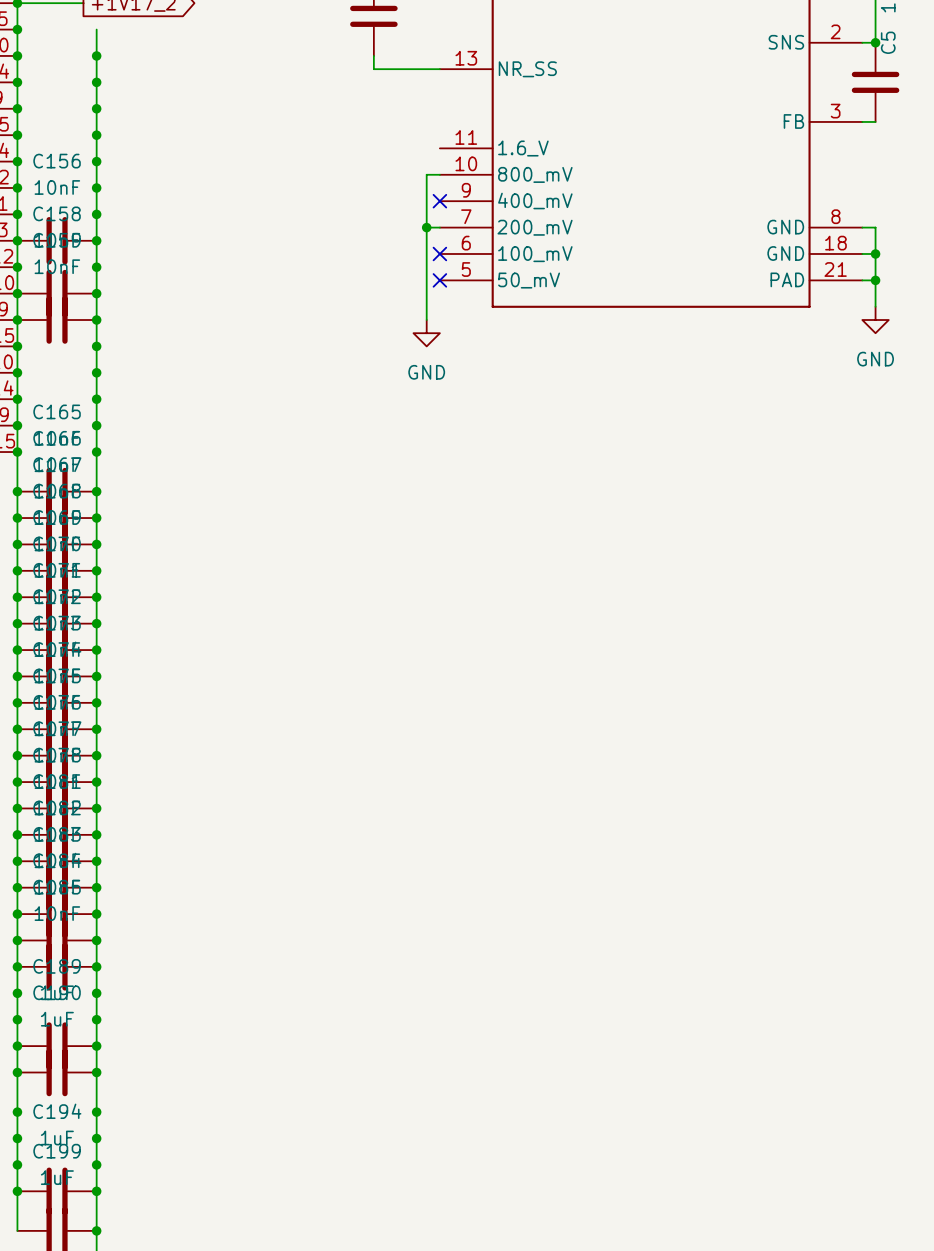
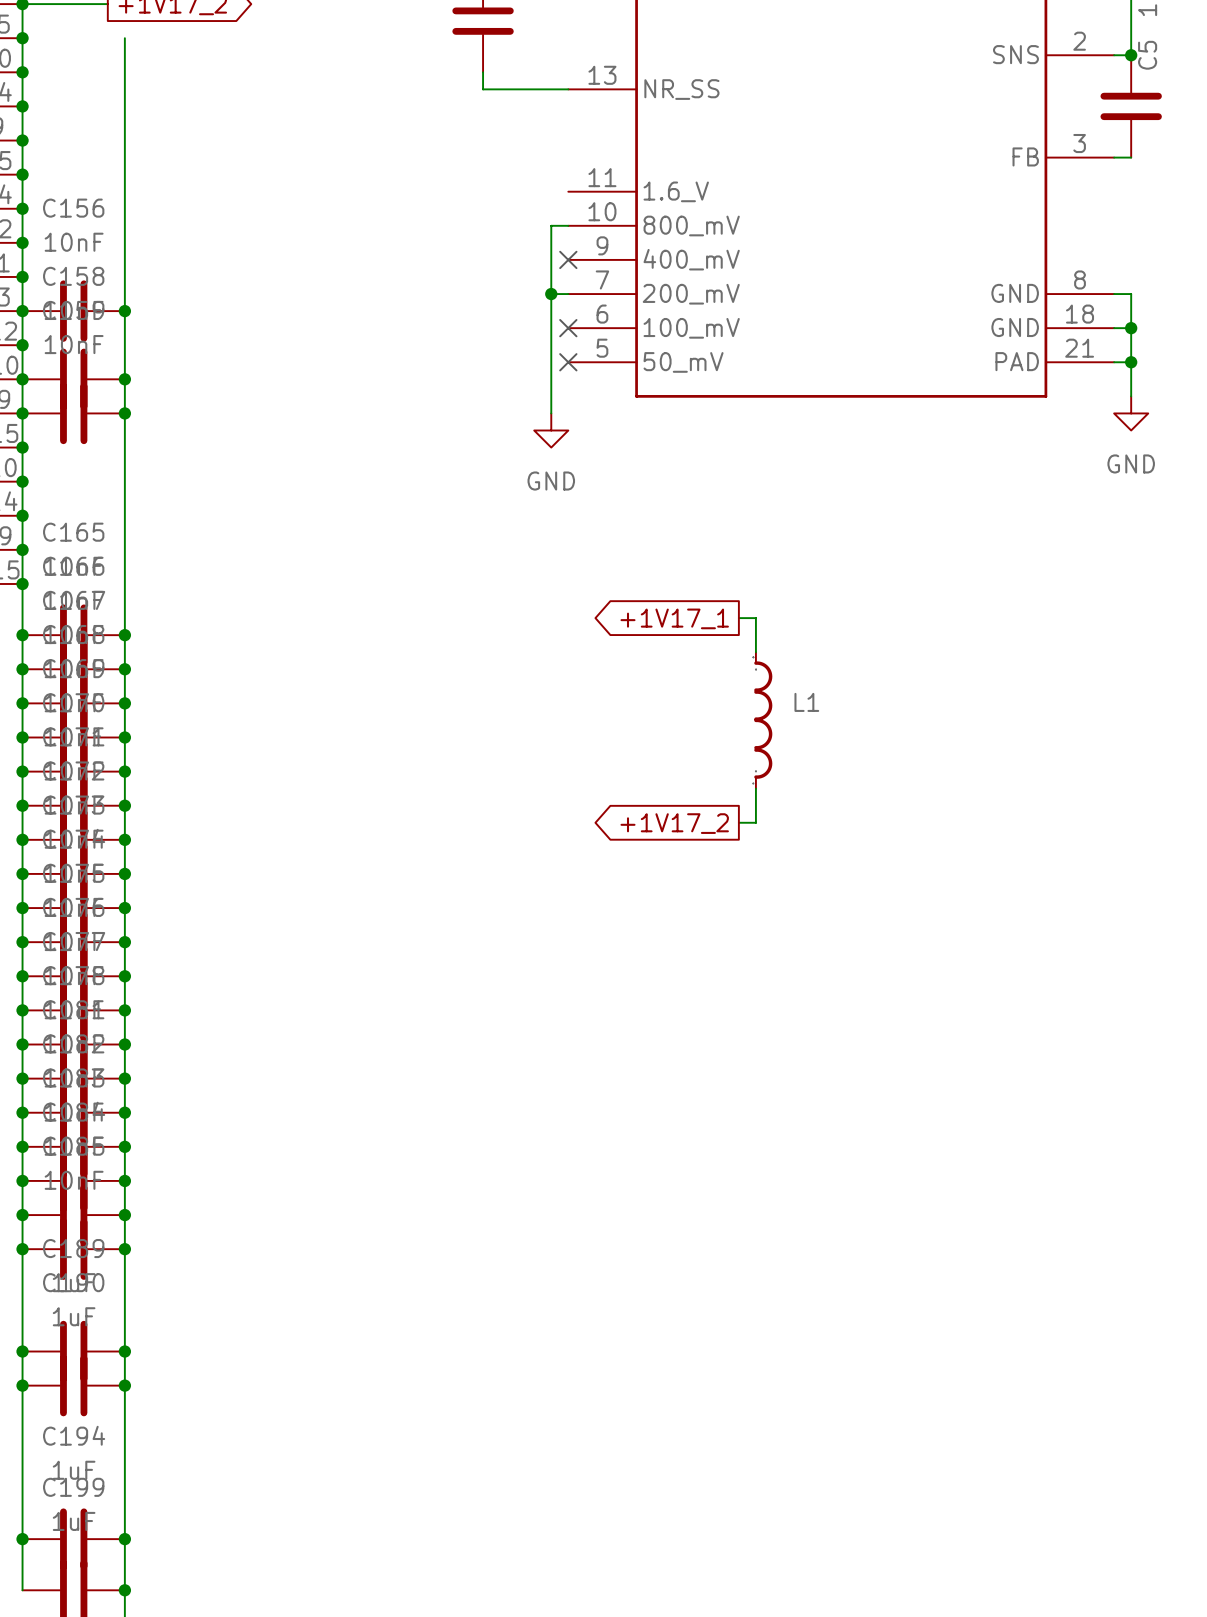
junction: (96, 55) -> none
junction: (96, 82) -> none
junction: (96, 108) -> none
junction: (96, 135) -> none
junction: (96, 161) -> none
junction: (96, 187) -> none
junction: (96, 214) -> none
junction: (96, 267) -> none
junction: (96, 346) -> none
junction: (96, 372) -> none
junction: (96, 399) -> none
junction: (96, 425) -> none
junction: (96, 452) -> none
wire: none -> (738, 618) (755, 618) (755, 652)
global label: none -> +1V17_1 (674, 618)
L1: none -> (763, 720)
wire: none -> (755, 788) (755, 822) (738, 822)
global label: none -> +1V17_2 (674, 823)
junction: (17, 993) -> none
junction: (96, 993) -> none
junction: (17, 1019) -> none
junction: (96, 1019) -> none
junction: (17, 1112) -> none
junction: (96, 1112) -> none
junction: (17, 1138) -> none
junction: (96, 1138) -> none
junction: (17, 1164) -> none
junction: (96, 1164) -> none

